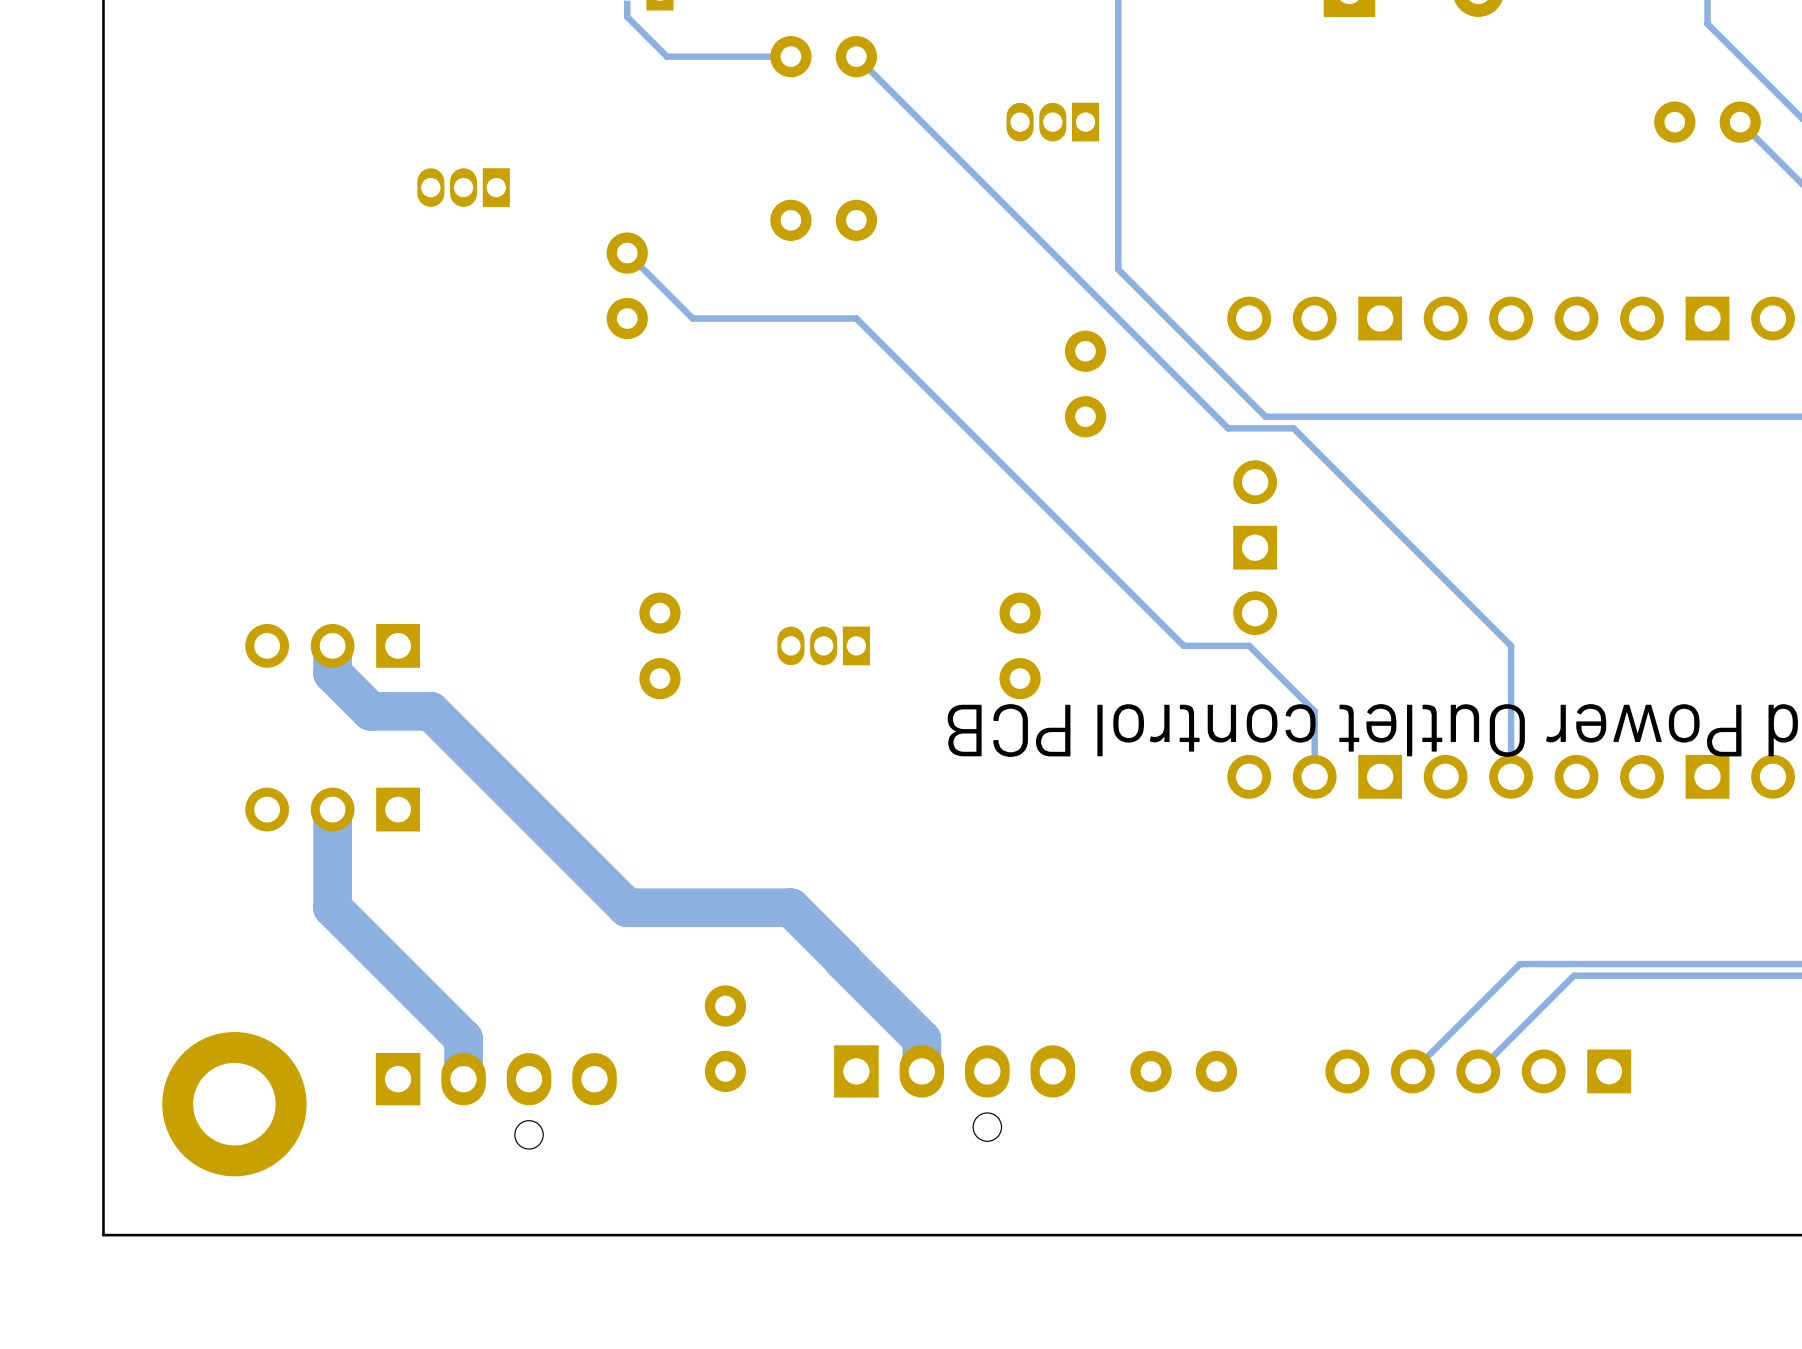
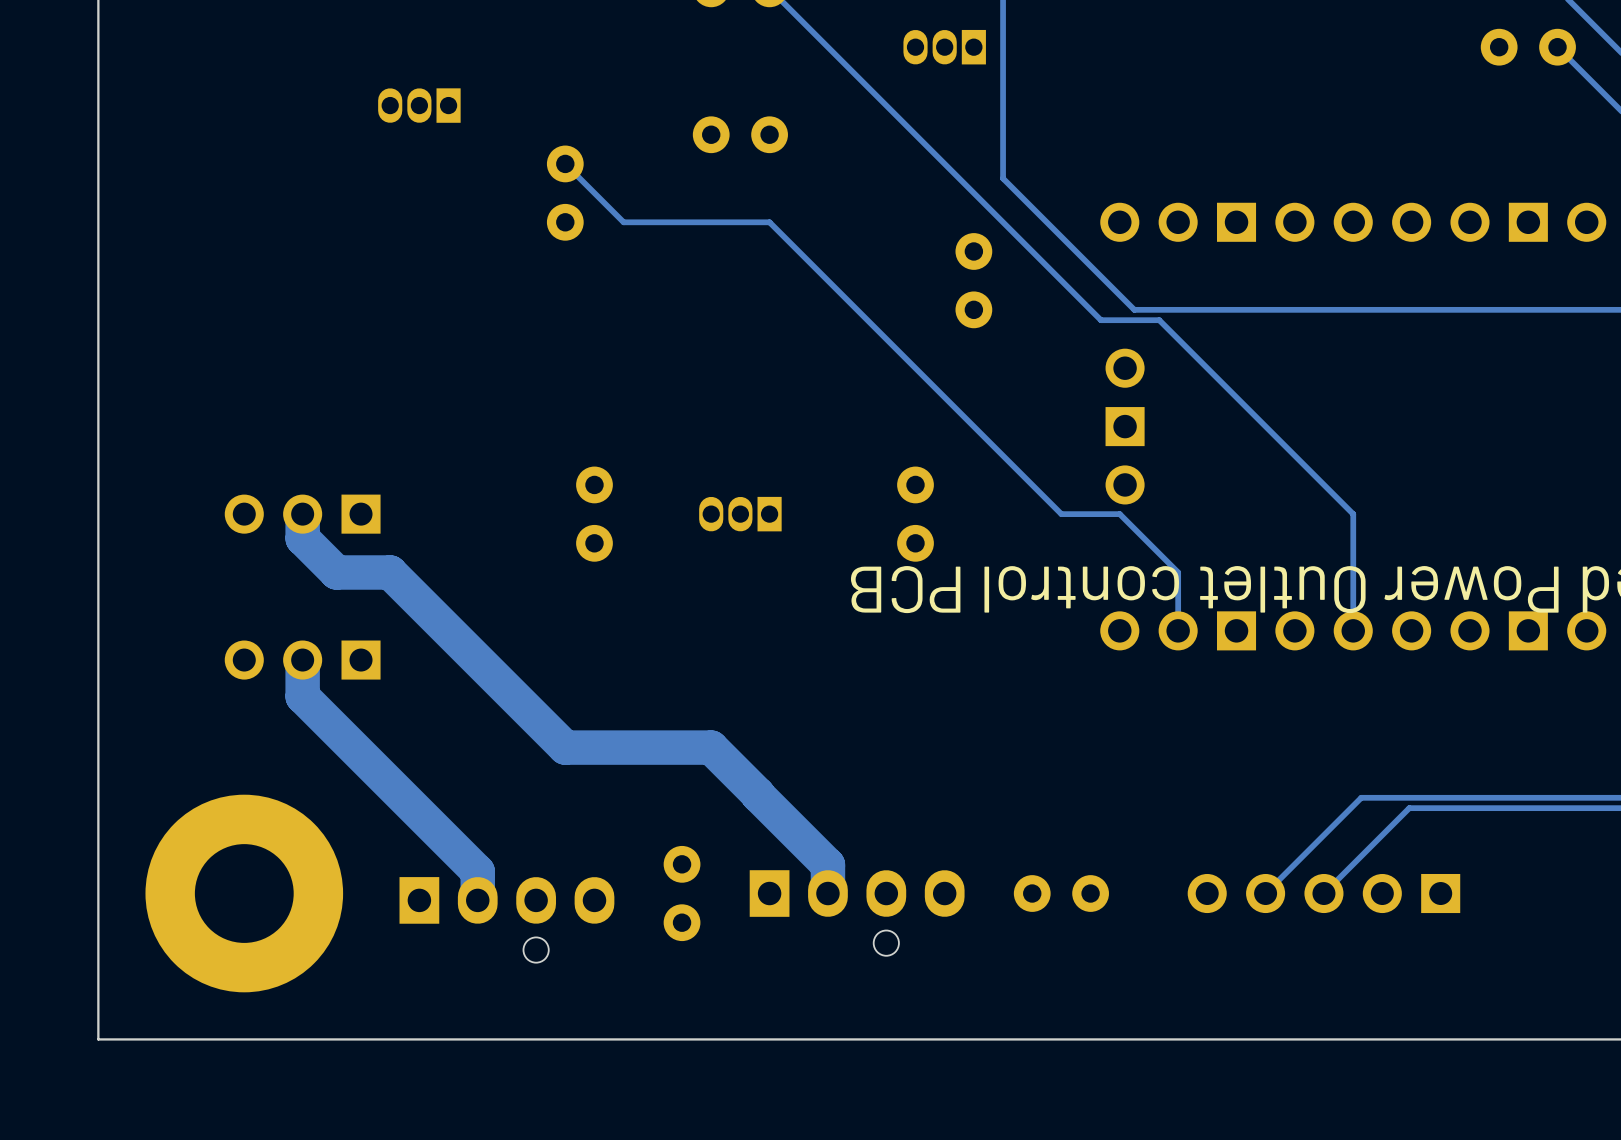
track: (332, 850) (332, 907) (463, 1038) (463, 1079) -> (302, 696) (477, 871) (477, 900)
part position: (725, 1038) -> (682, 893)
part: none -> (244, 893)
part position: (496, 1101) -> (506, 919)
part: (234, 1104) -> none

